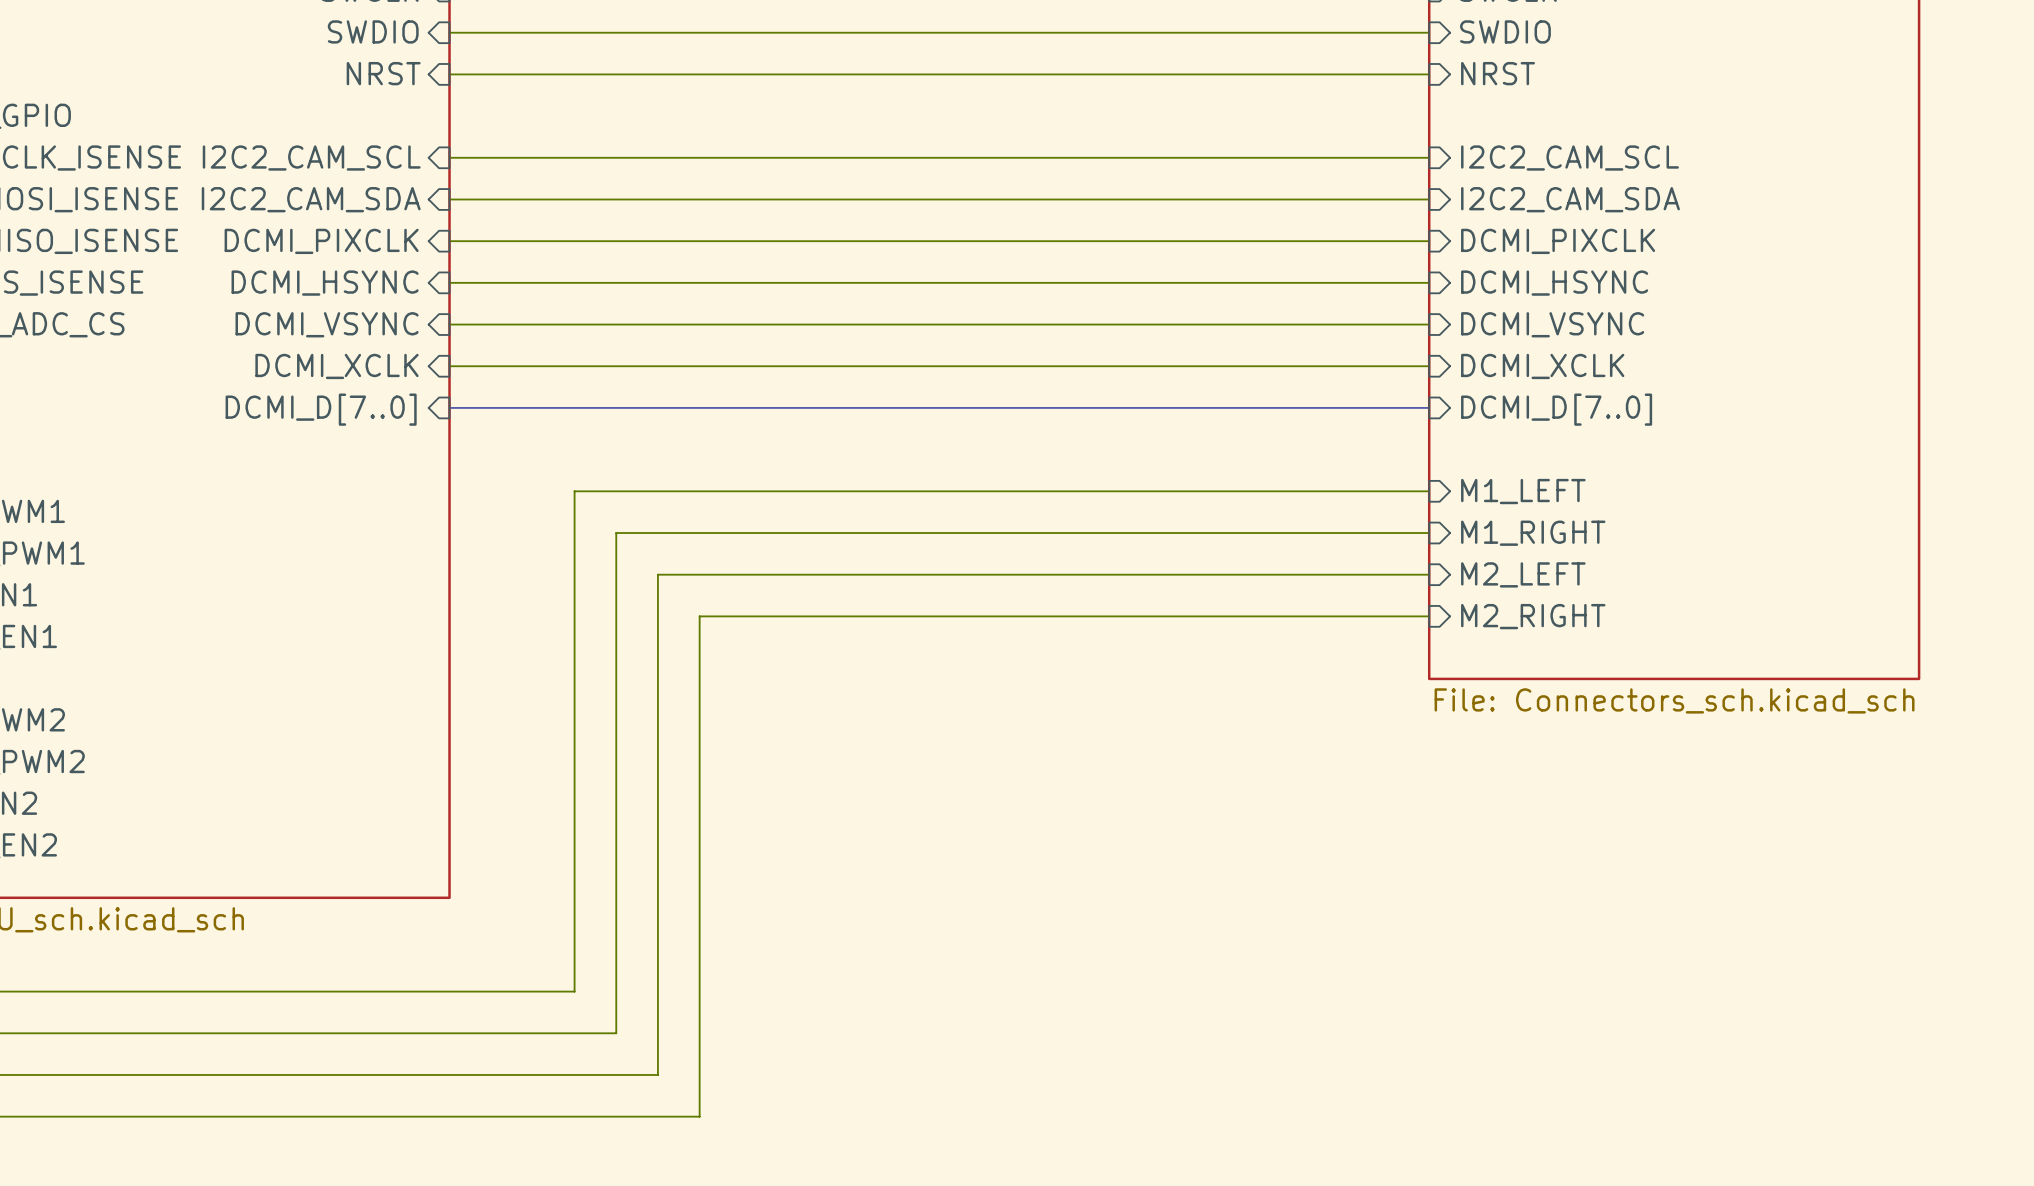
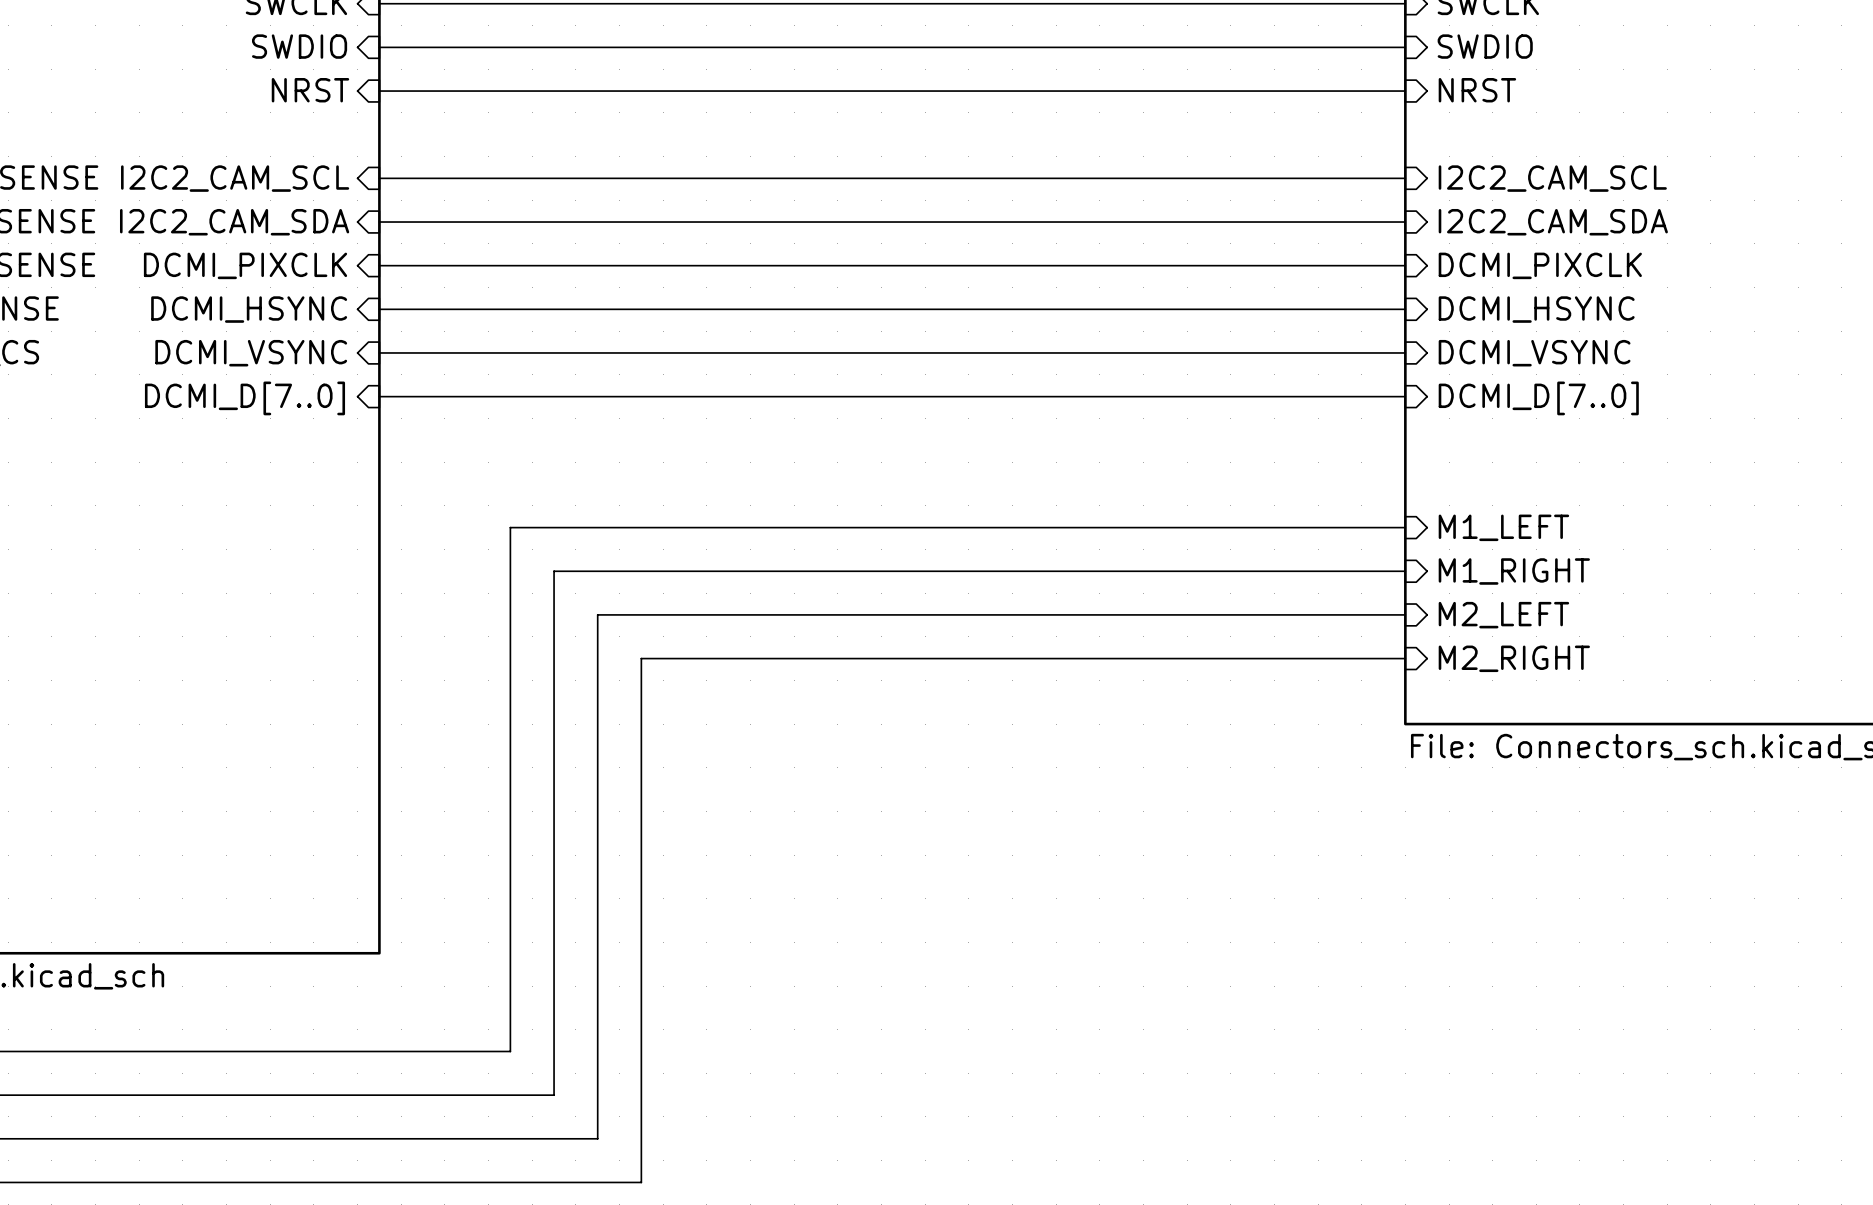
sheet pin: DCMI_XCLK (337, 366) -> DCMI_D[7..0] (244, 398)
sheet pin: DCMI_XCLK (1542, 366) -> DCMI_D[7..0] (1538, 398)
bus: (449, 407) (1429, 407) -> (379, 396) (1405, 396)
sheet pin: DCMI_D[7..0] (321, 409) -> none
sheet pin: DCMI_D[7..0] (1556, 409) -> none

